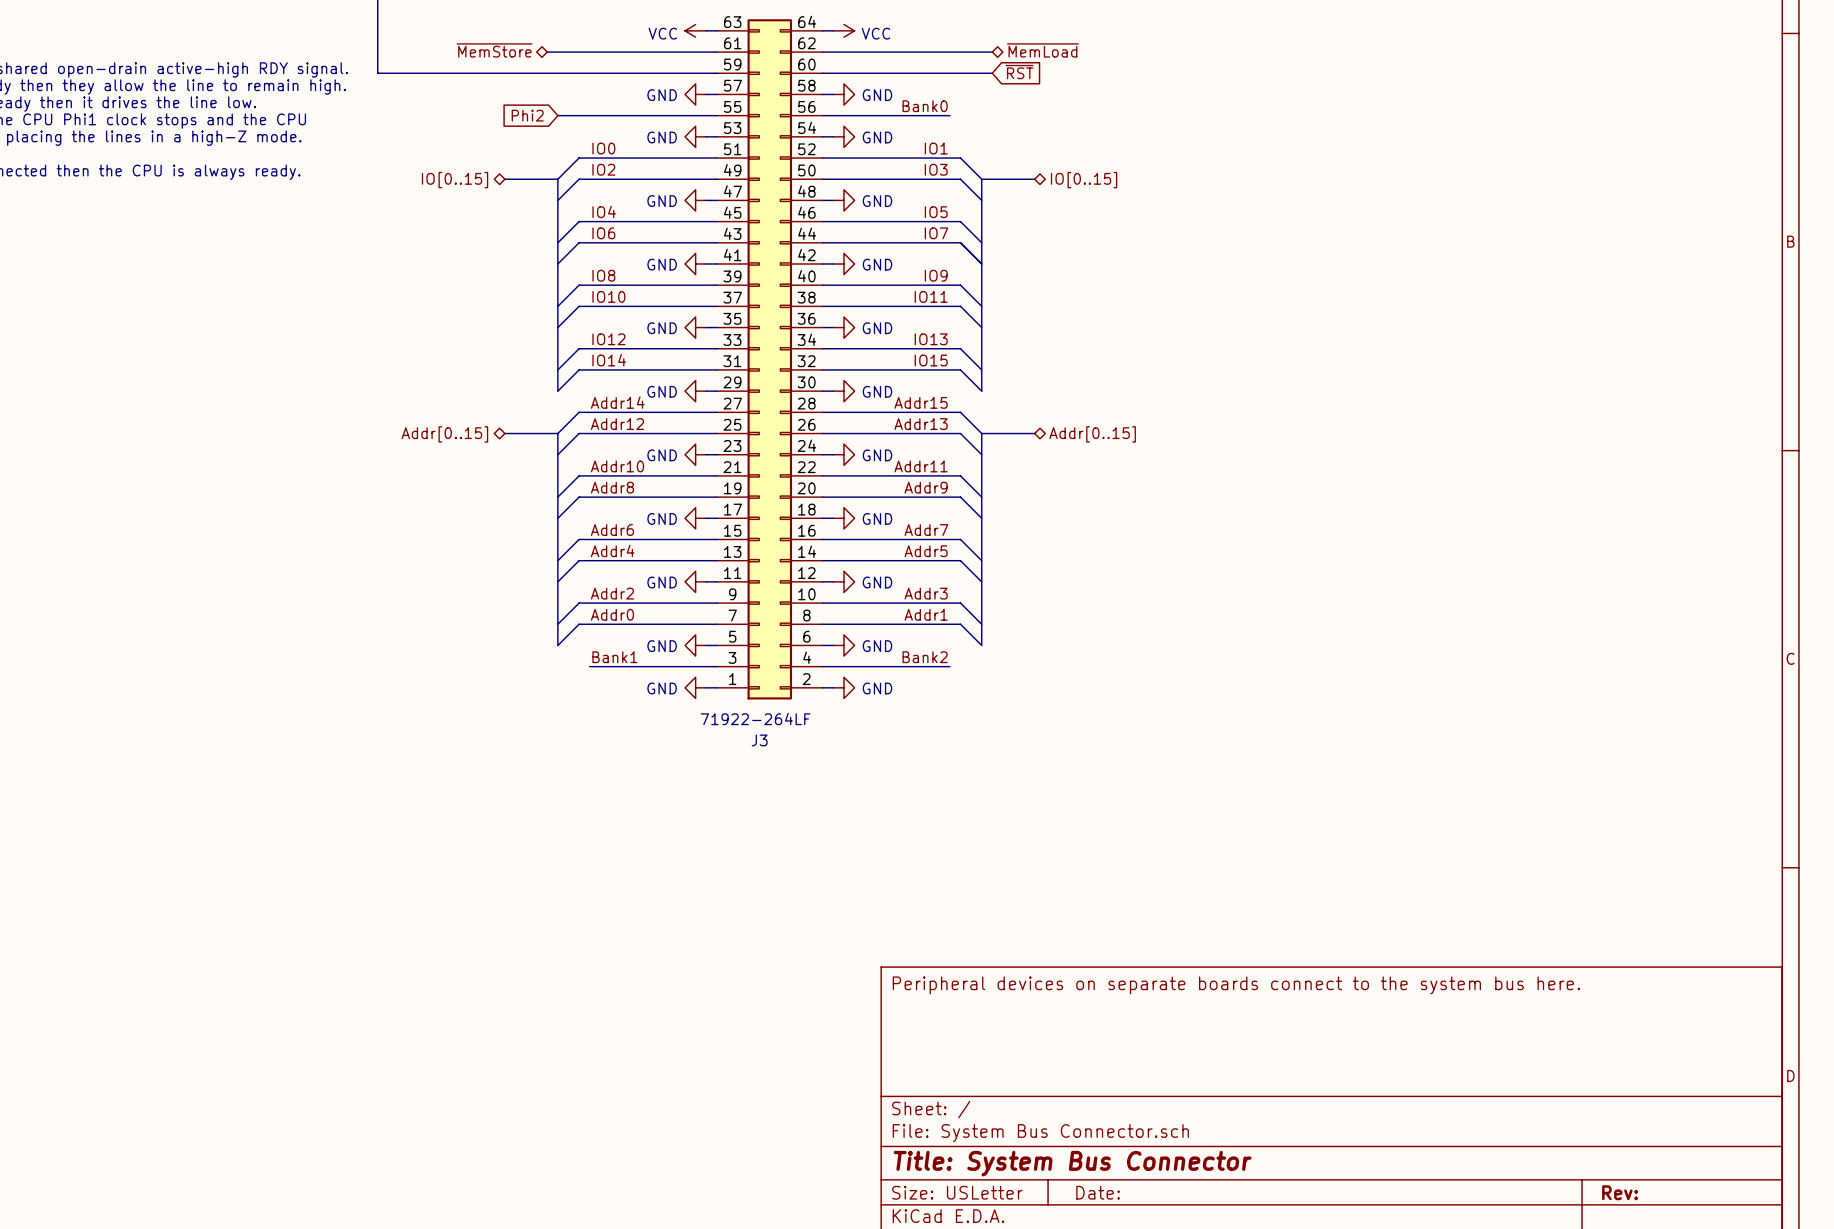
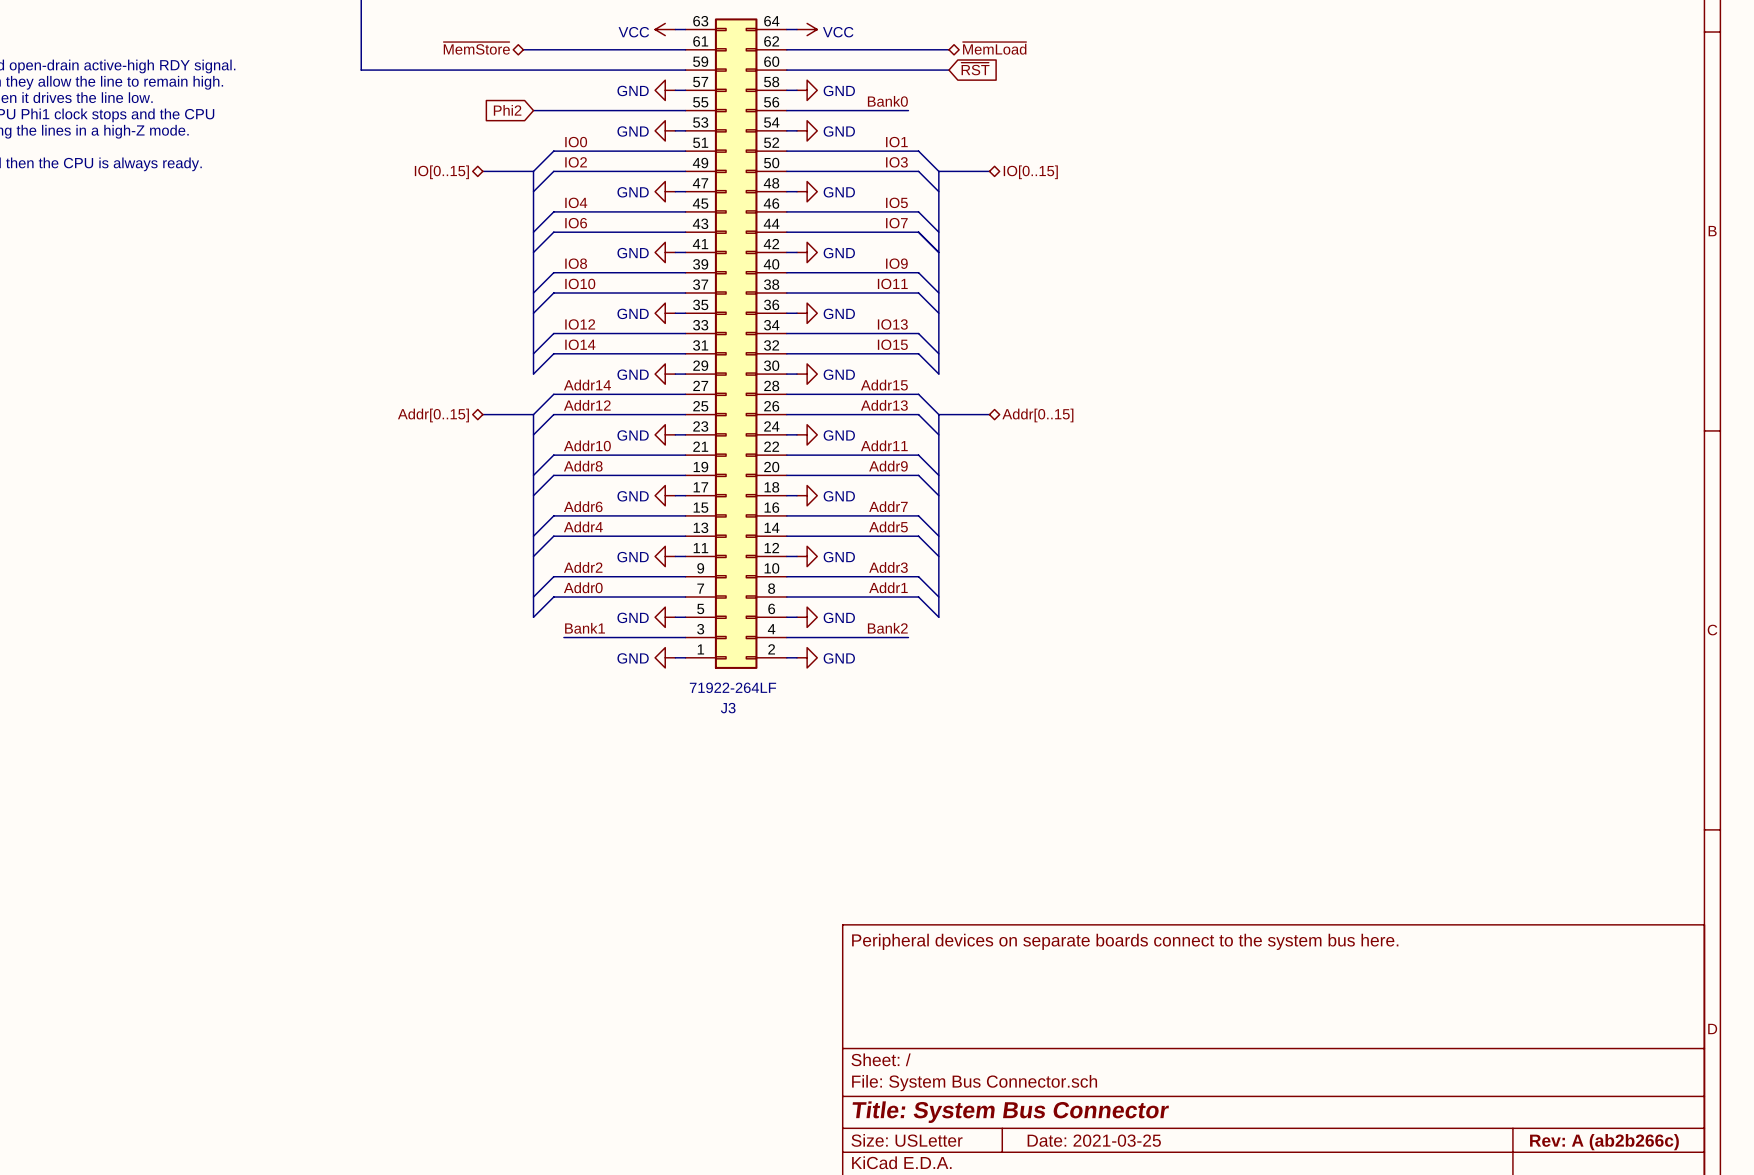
title block: Date: (1098, 1192) -> Date: 2021-03-25 (1094, 1140)
title block: Rev: (1620, 1192) -> Rev: A (ab2b266c) (1604, 1142)

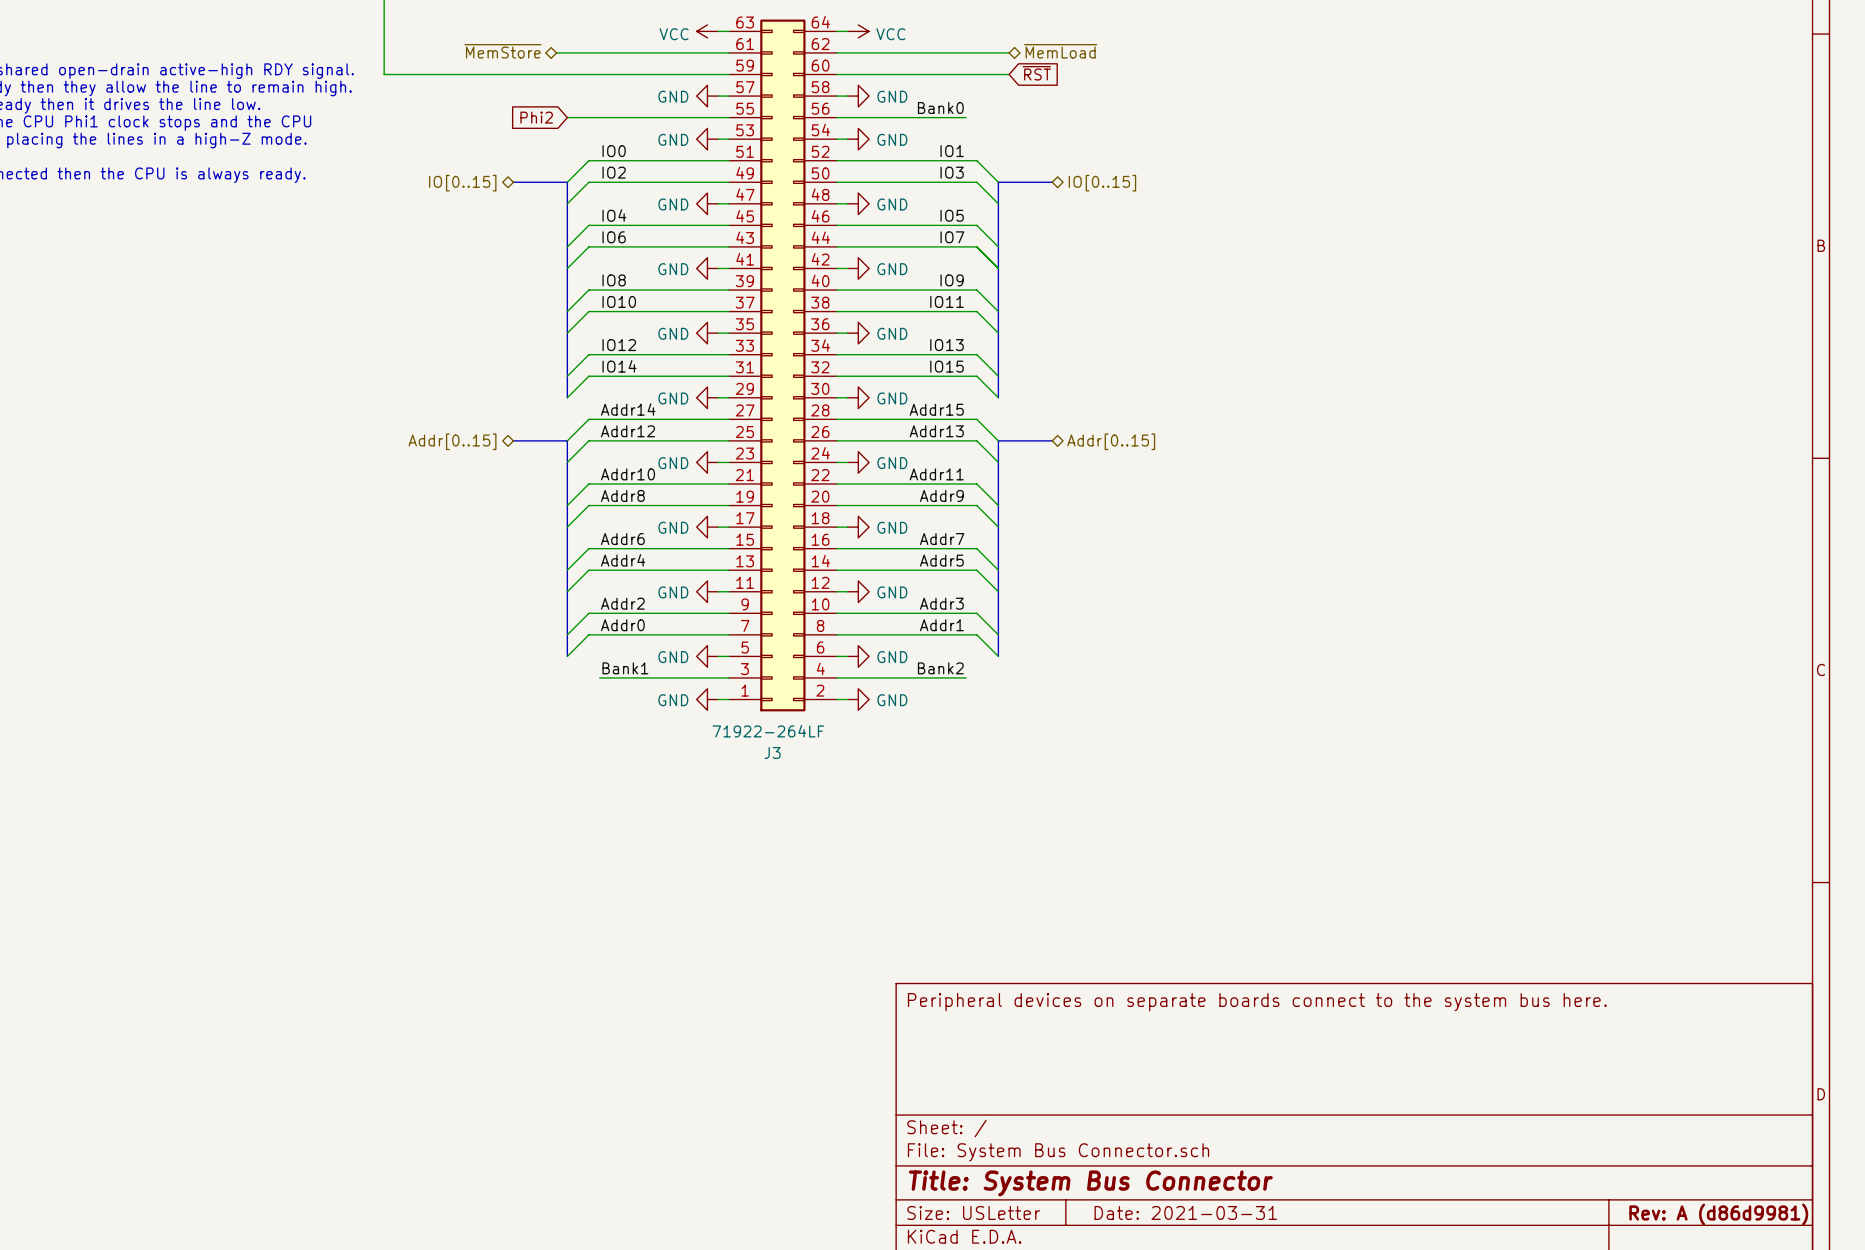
title block: Date: 2021-03-25 (1094, 1140) -> Date: 2021-03-31 (1185, 1212)
title block: Rev: A (ab2b266c) (1604, 1142) -> Rev: A (d86d9981) (1718, 1214)

